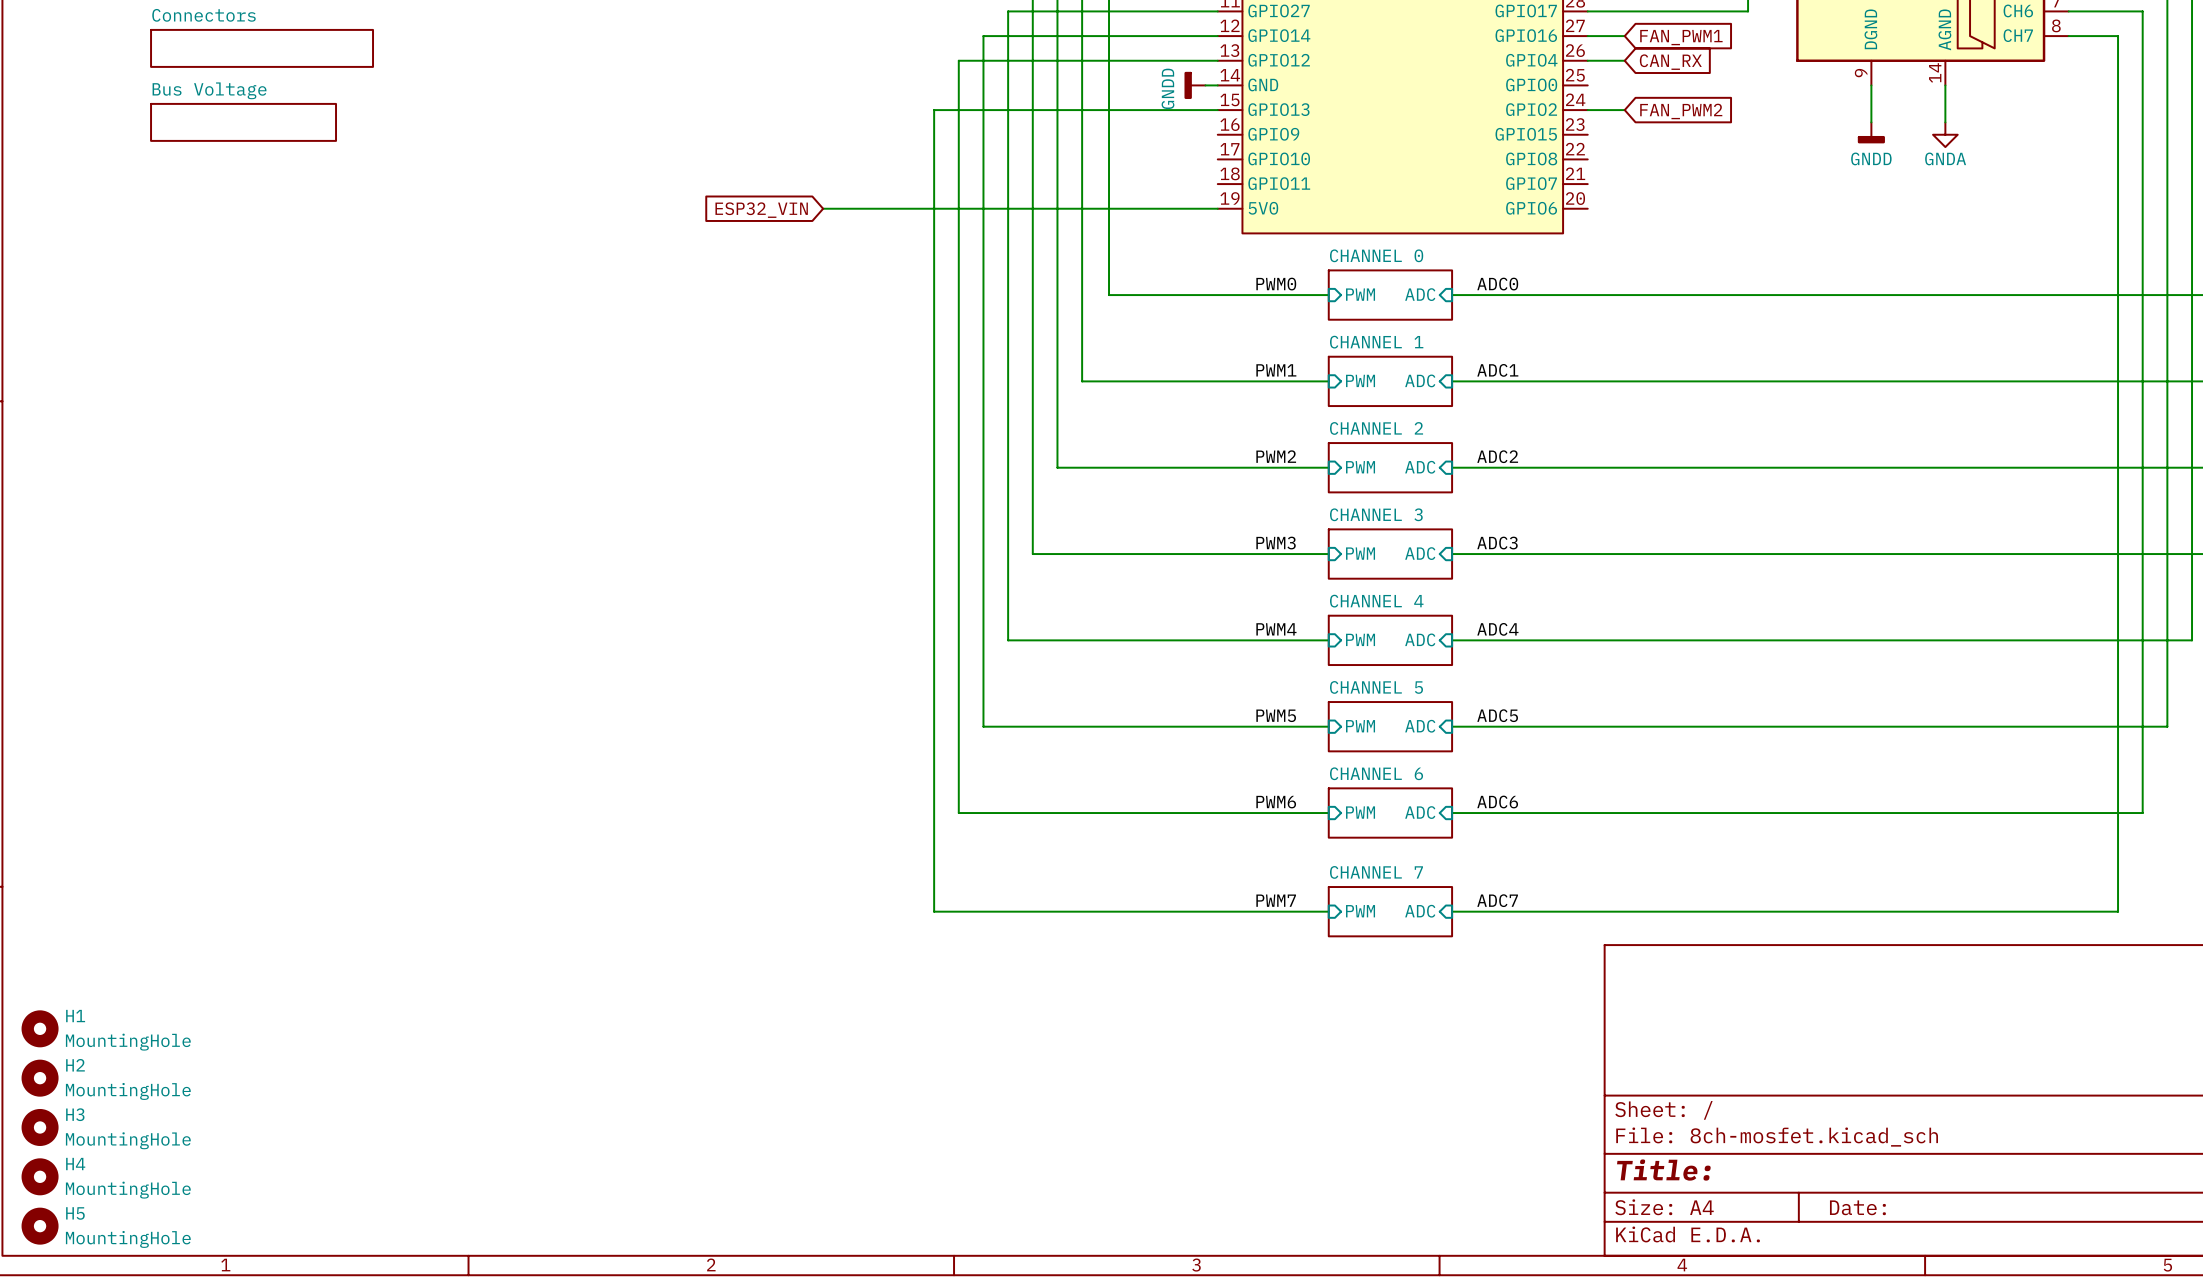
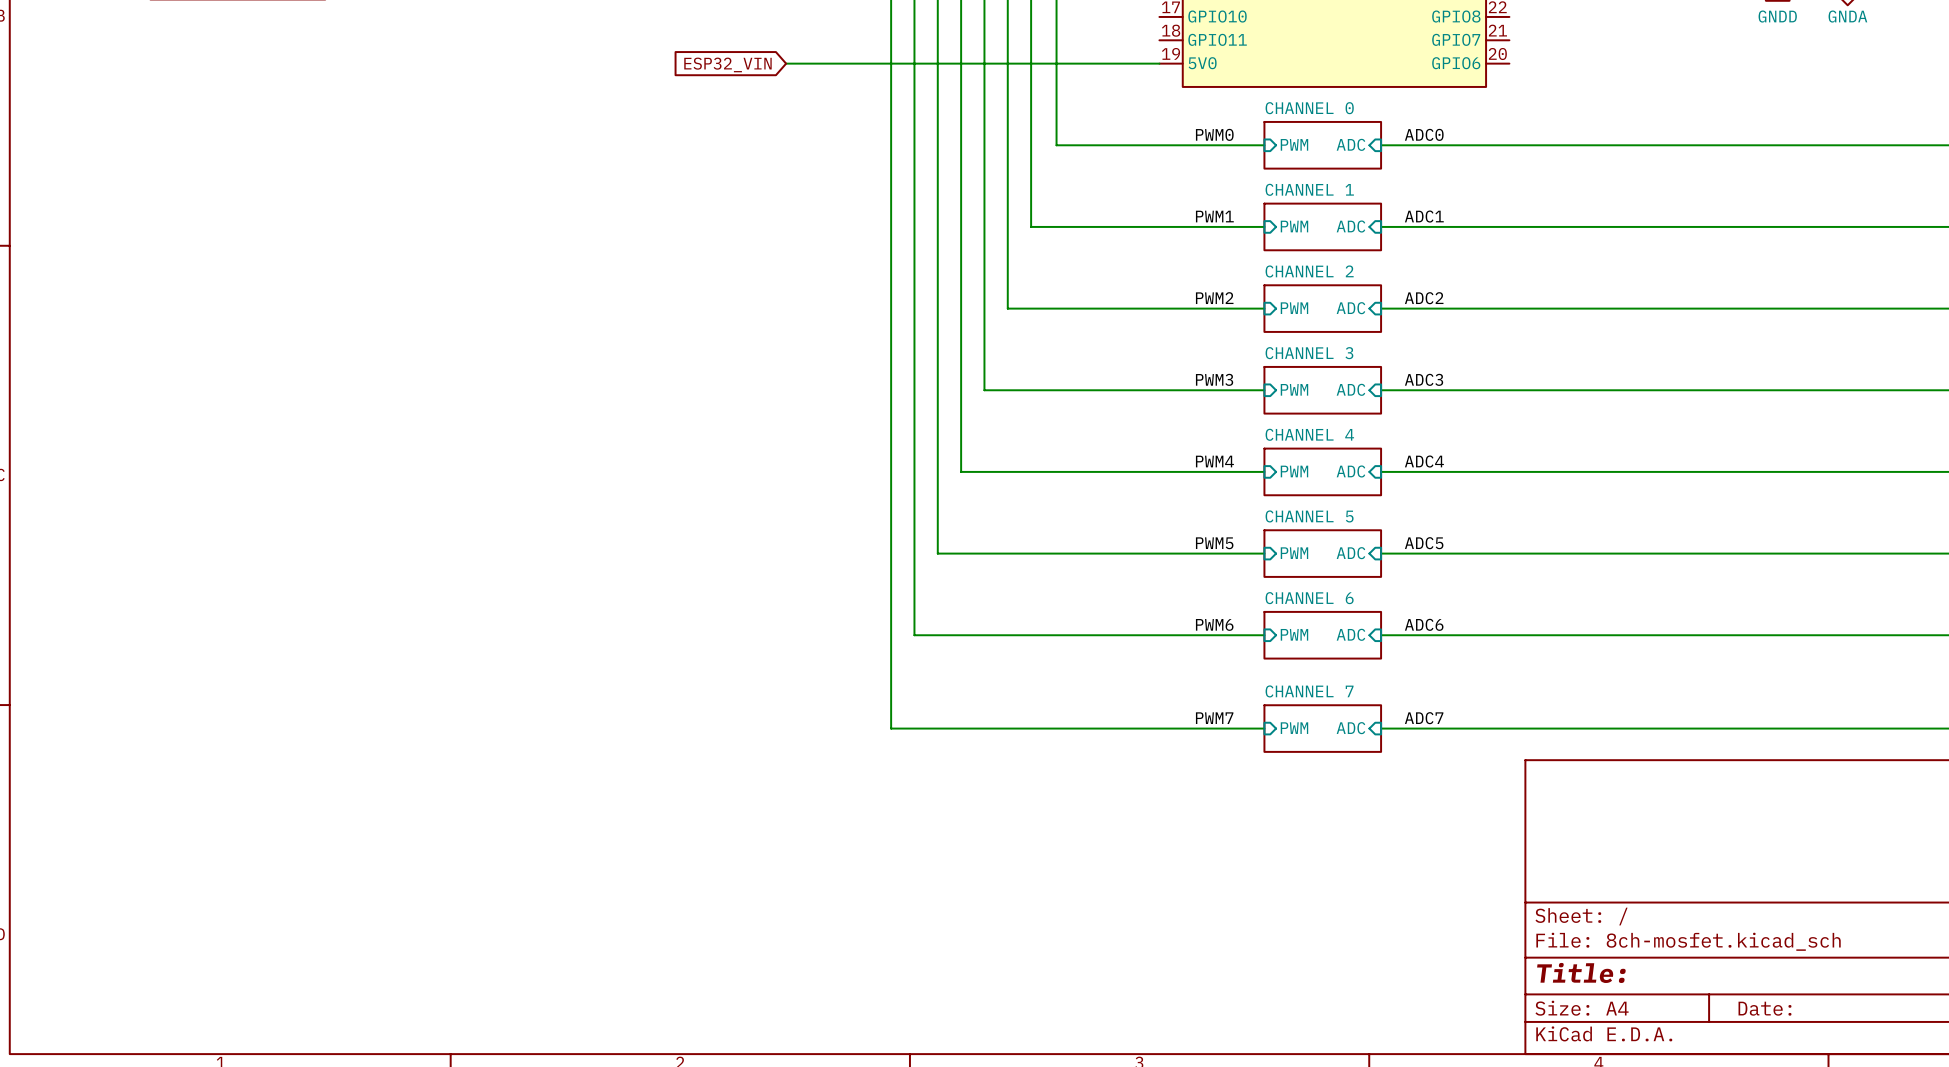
H1: MountingHole (40, 1028) -> none
H2: MountingHole (40, 1078) -> none
H3: MountingHole (40, 1127) -> none
H4: MountingHole (40, 1176) -> none
H5: MountingHole (40, 1226) -> none

